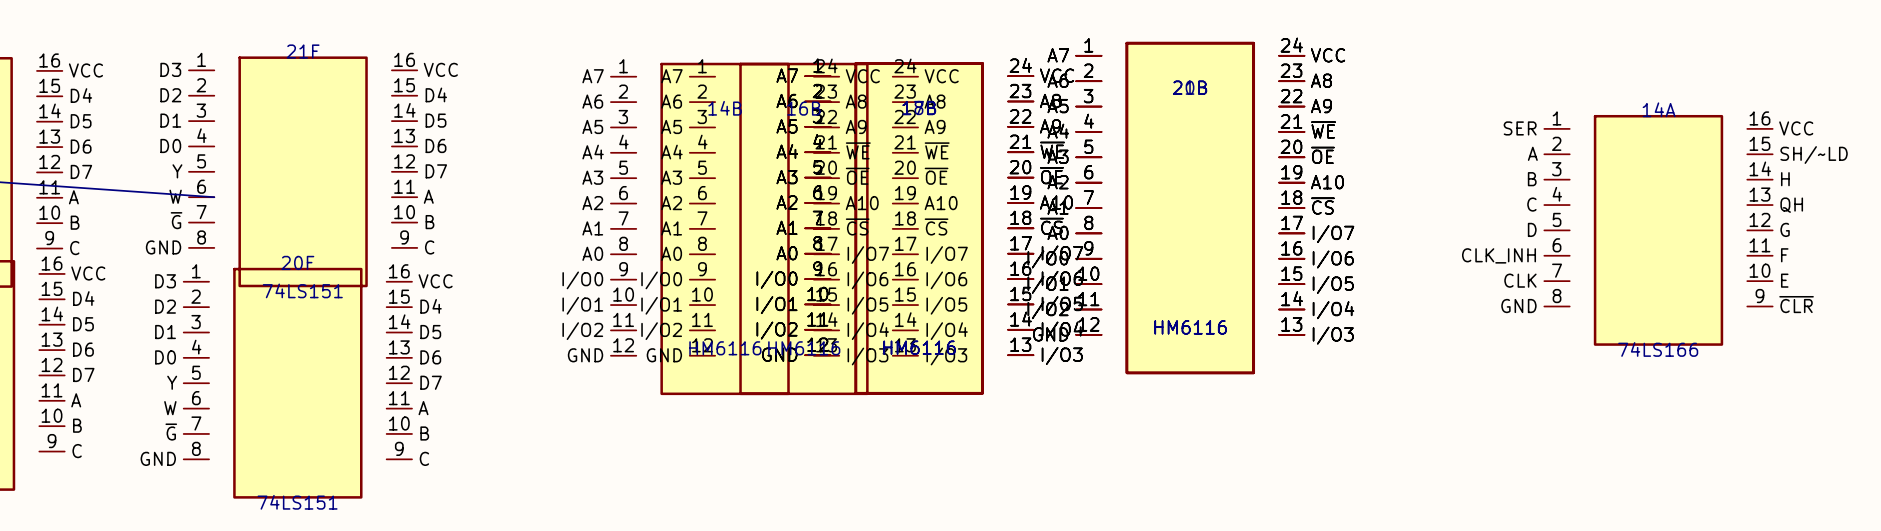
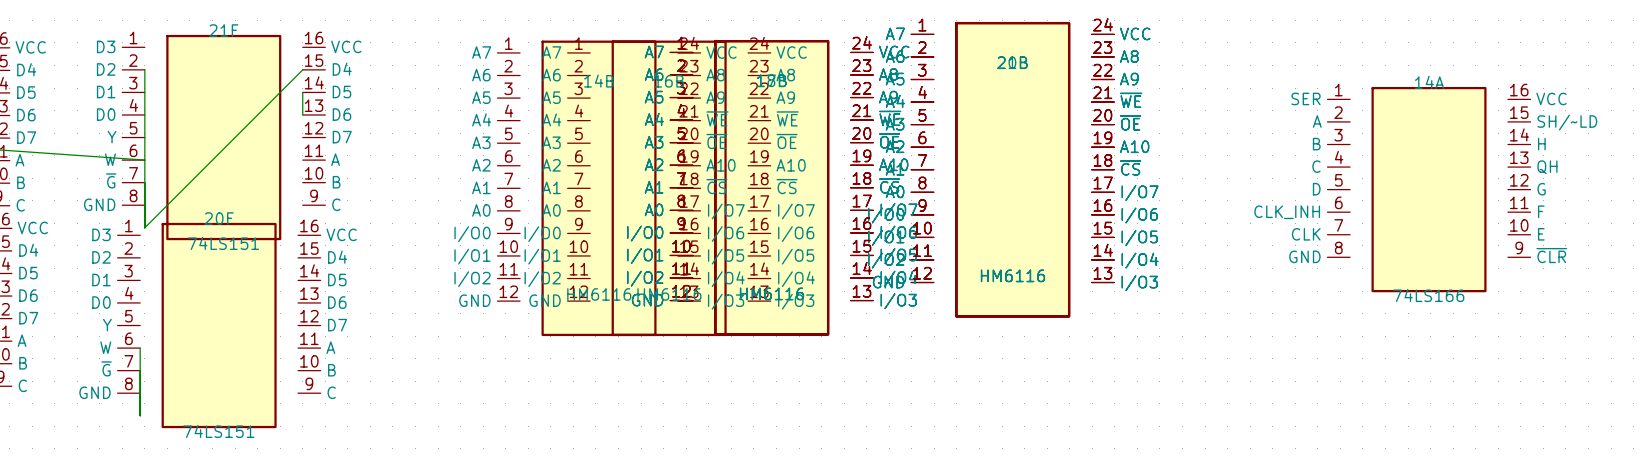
wire: none -> (144, 69) (144, 227) (302, 69)
wire: none -> (302, 92) (302, 114)
wire: none -> (140, 348) (140, 415)

